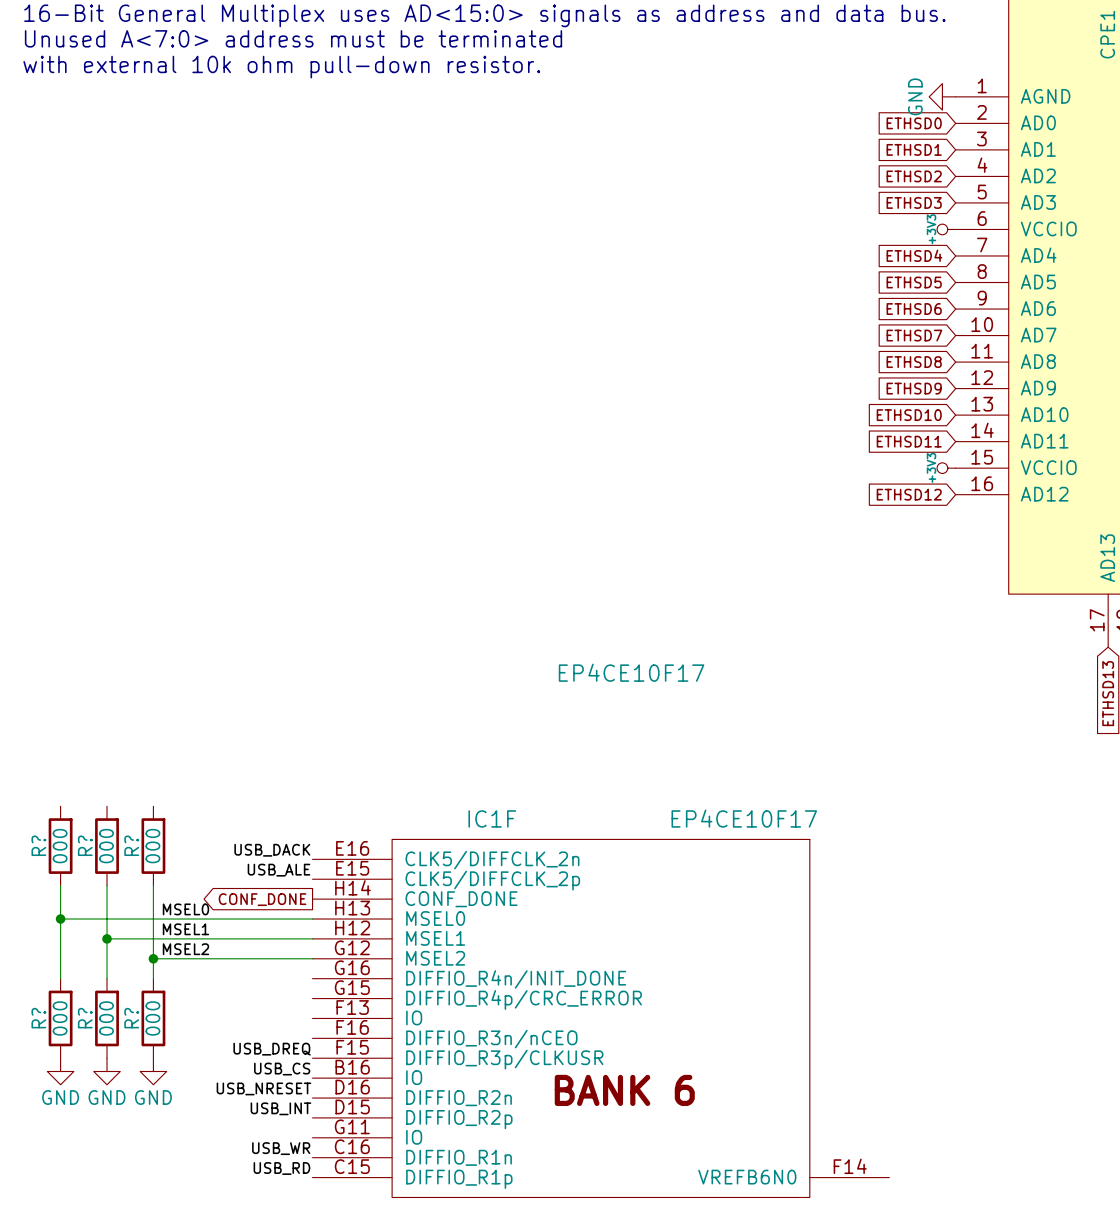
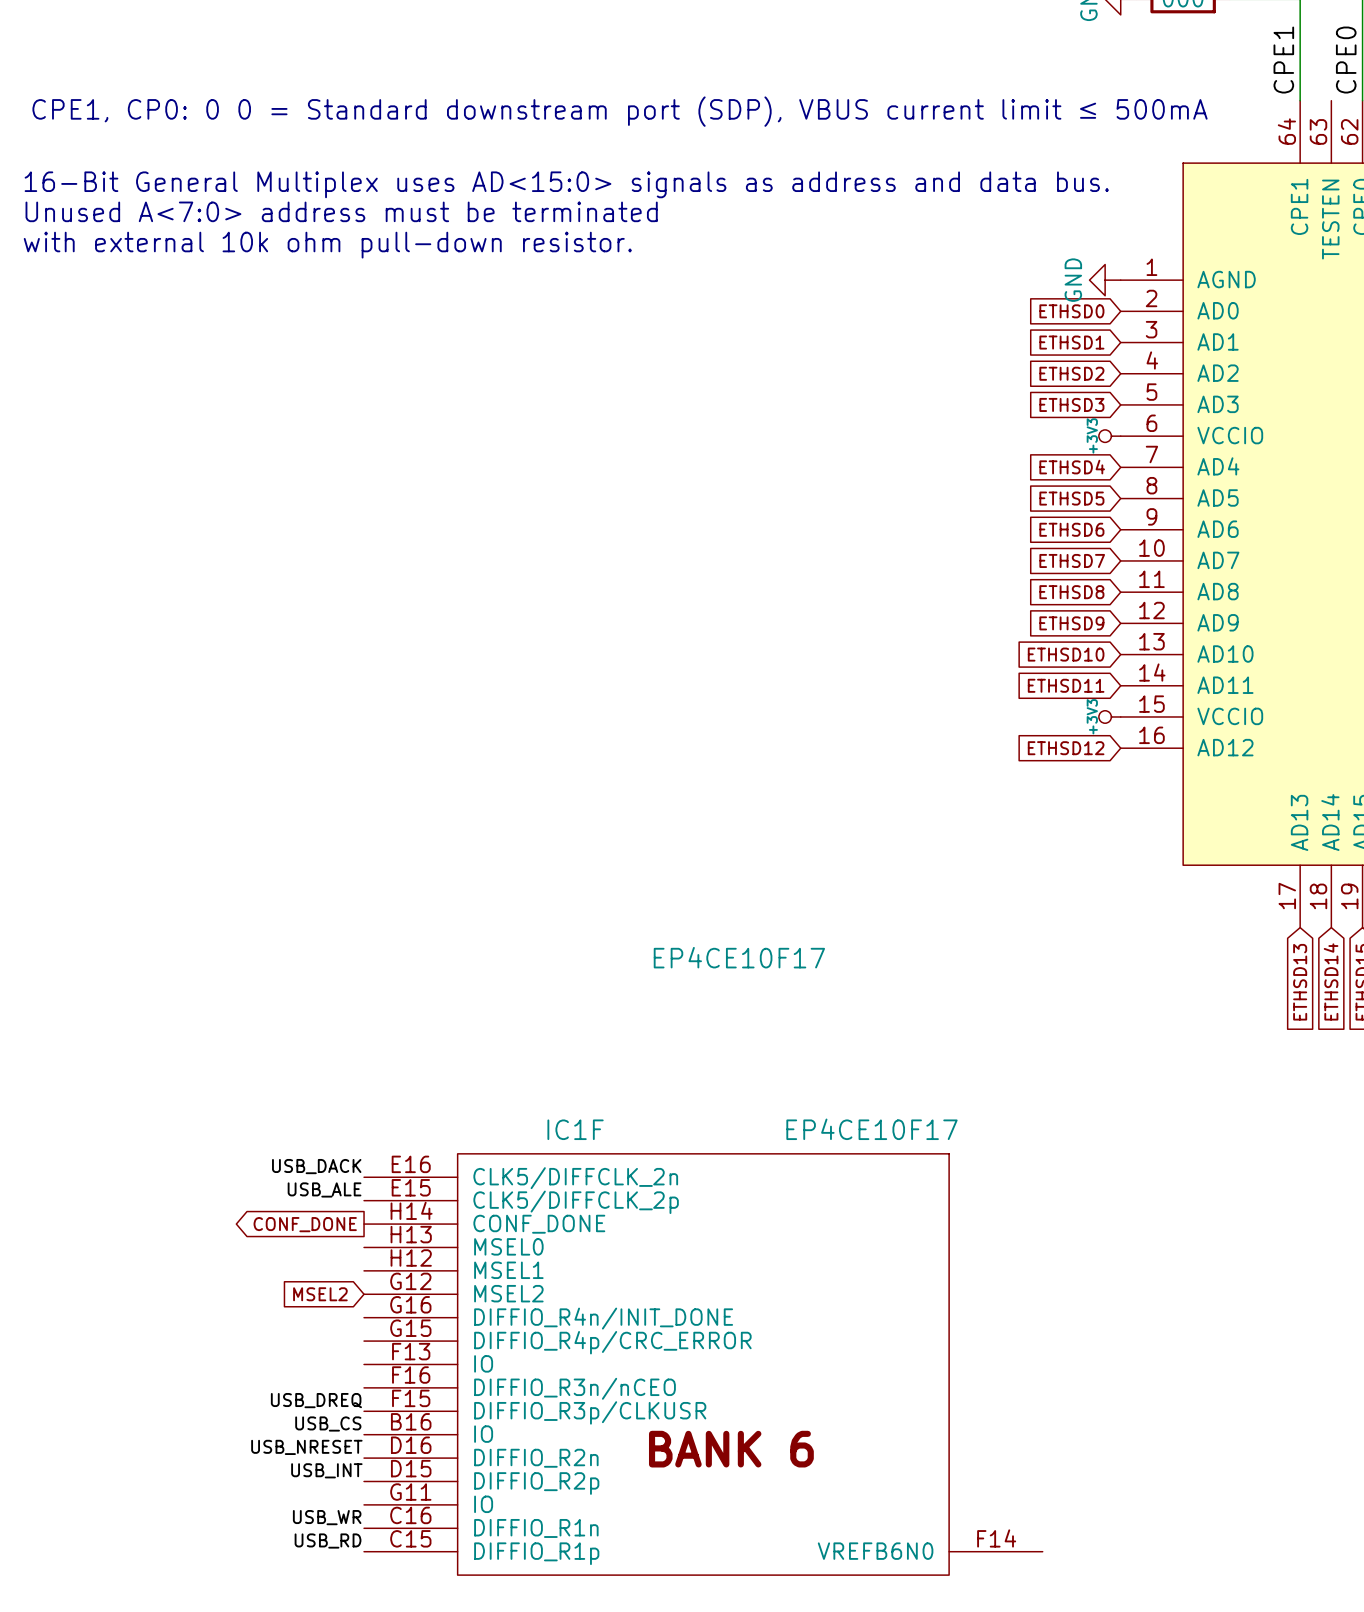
R?: 000 (60, 846) -> none
R?: 000 (107, 846) -> none
R?: 000 (153, 846) -> none
wire: (60, 885) (60, 978) -> none
wire: (107, 885) (107, 978) -> none
wire: (153, 885) (153, 978) -> none
label: MSEL0 (185, 909) -> none
wire: (60, 919) (312, 919) -> none
junction: (60, 919) -> none
label: MSEL1 (185, 929) -> none
wire: (107, 938) (312, 938) -> none
junction: (107, 938) -> none
label: MSEL2 (185, 949) -> none
wire: (153, 958) (312, 958) -> none
junction: (153, 958) -> none
global label: none -> MSEL2 (320, 1294)
R?: 000 (60, 1018) -> none
R?: 000 (107, 1018) -> none
R?: 000 (153, 1018) -> none
power symbol: GND (60, 1071) -> none
power symbol: GND (107, 1071) -> none
power symbol: GND (153, 1071) -> none

